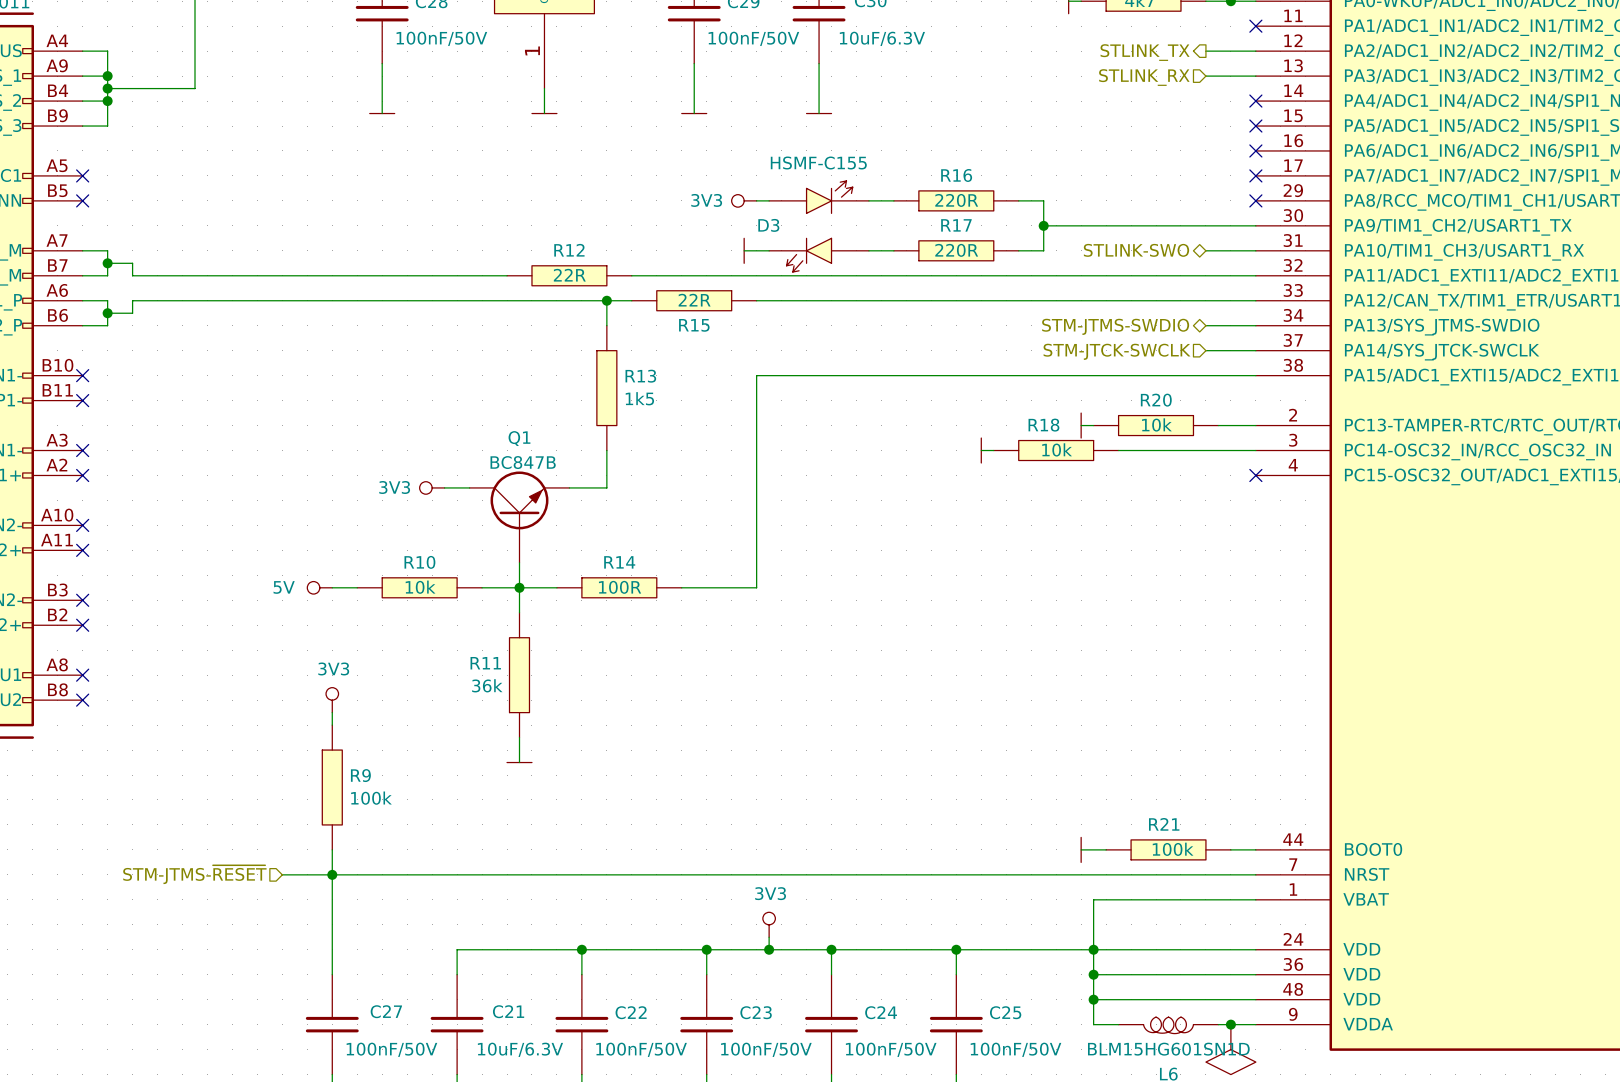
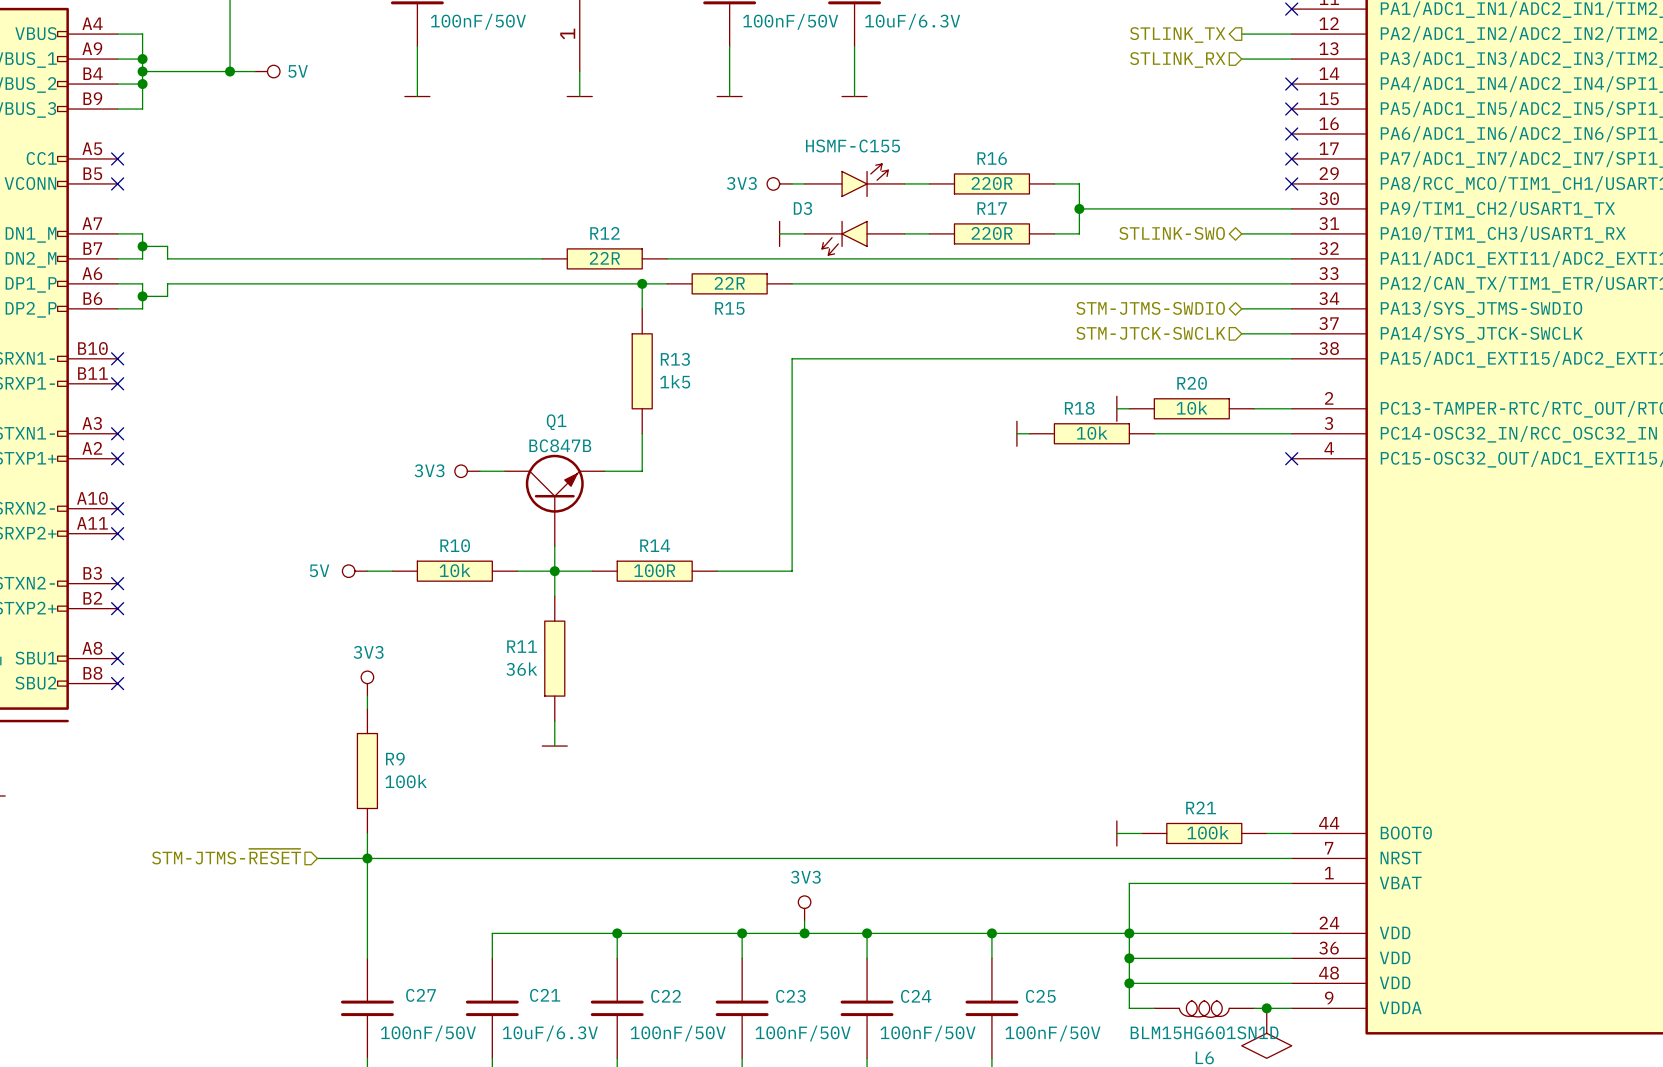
wire: none -> (230, 71) (255, 71)
junction: none -> (230, 71)
power symbol: none -> 5V (267, 71)

